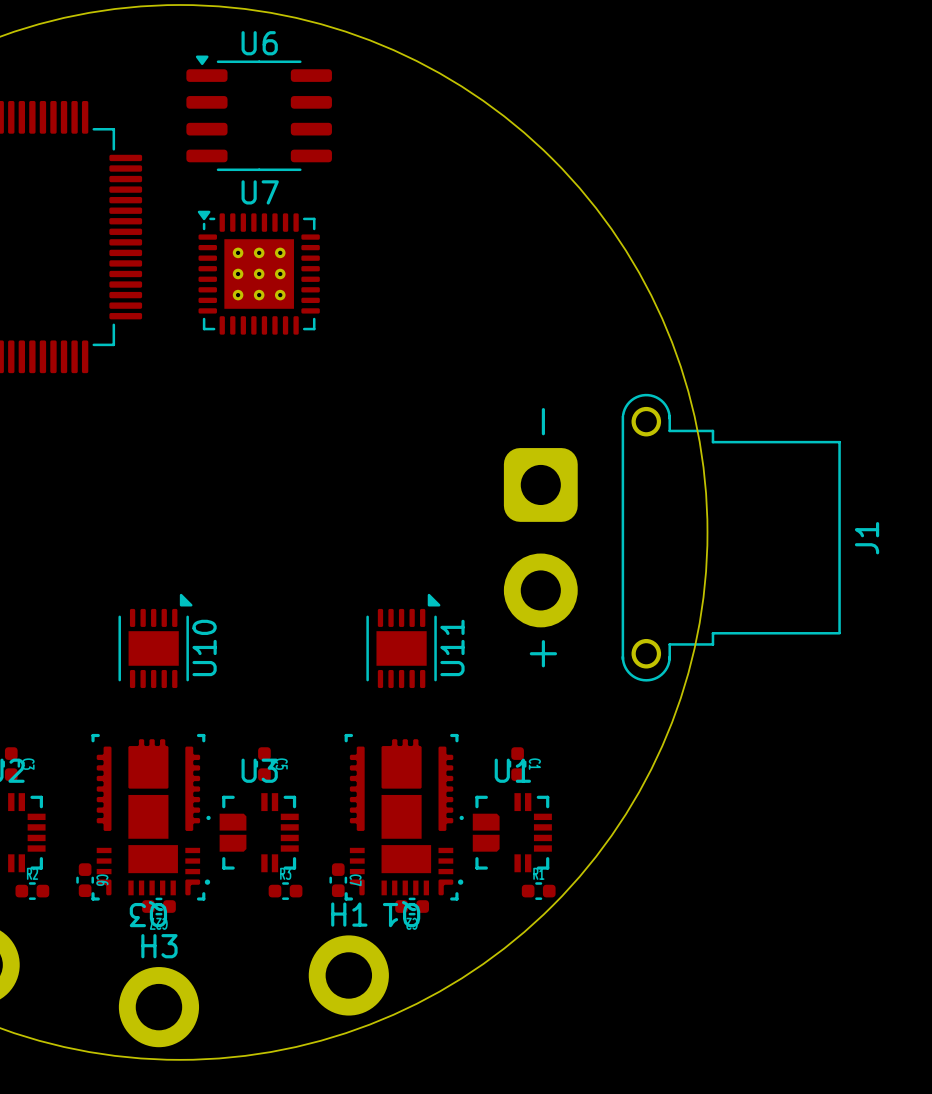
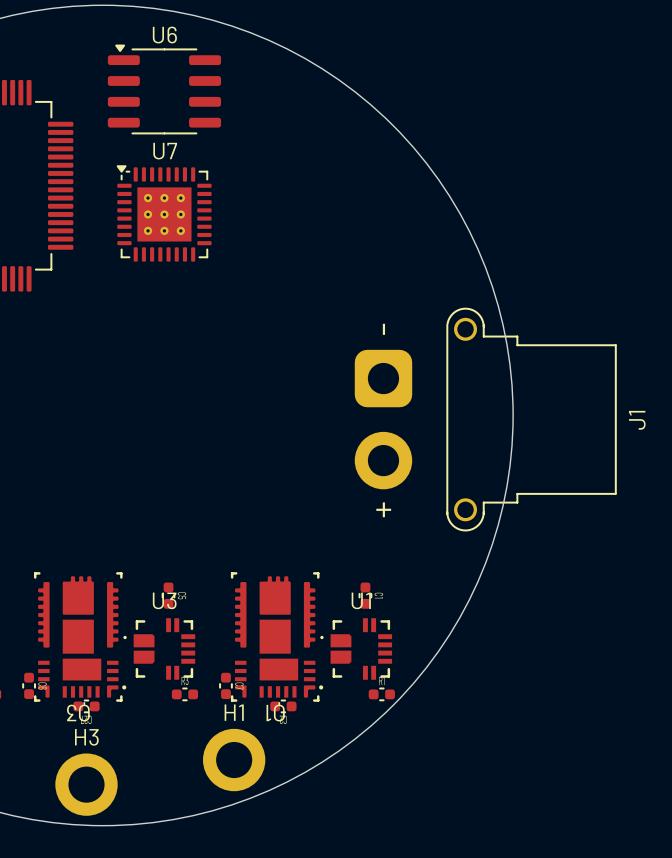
U10: (155, 640) -> none
U11: (403, 640) -> none

